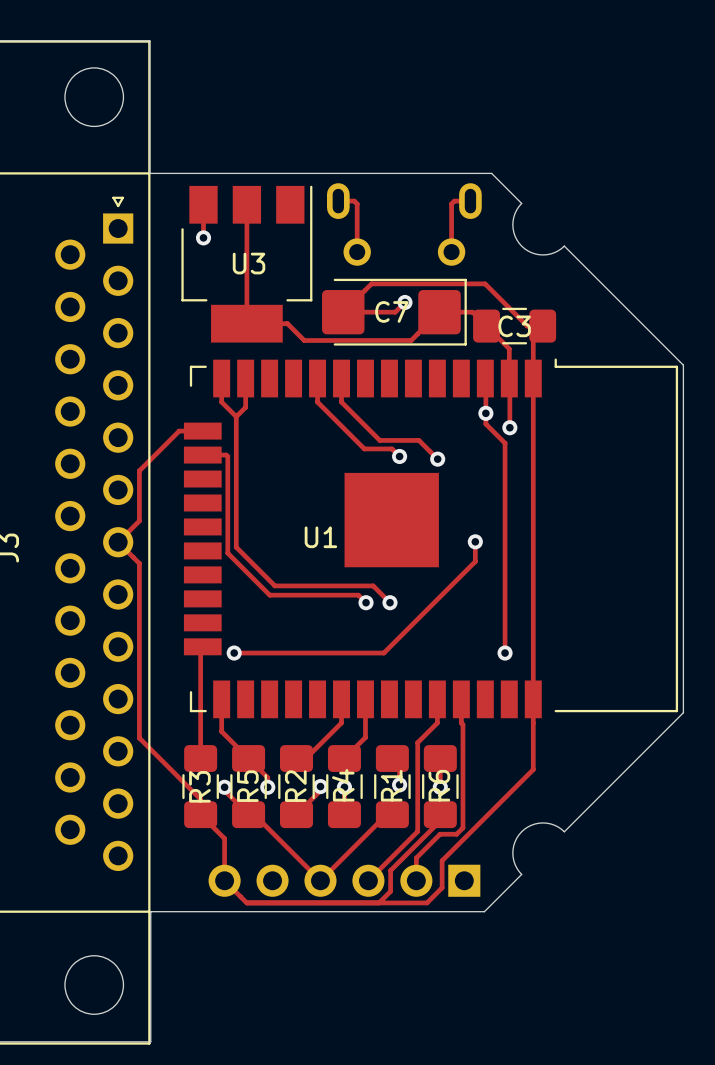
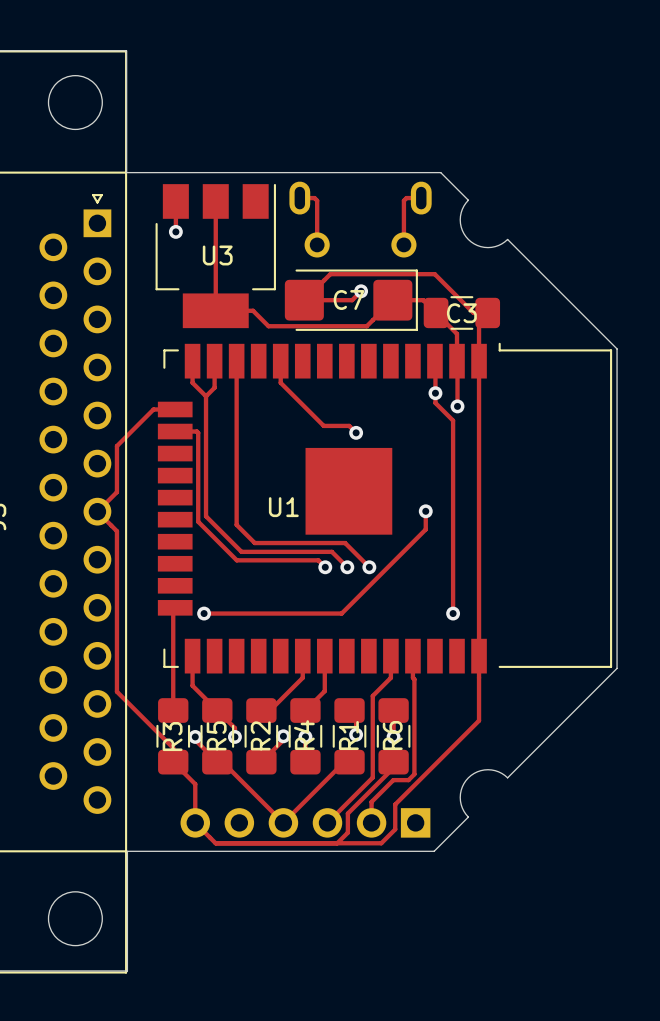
track: none -> (236, 361) (236, 524) (254, 543) (345, 543) (369, 567)
track: (341, 378) (341, 402) (379, 440) (418, 440) (437, 459) -> none
via: (437, 459) -> none
via: none -> (369, 567)

